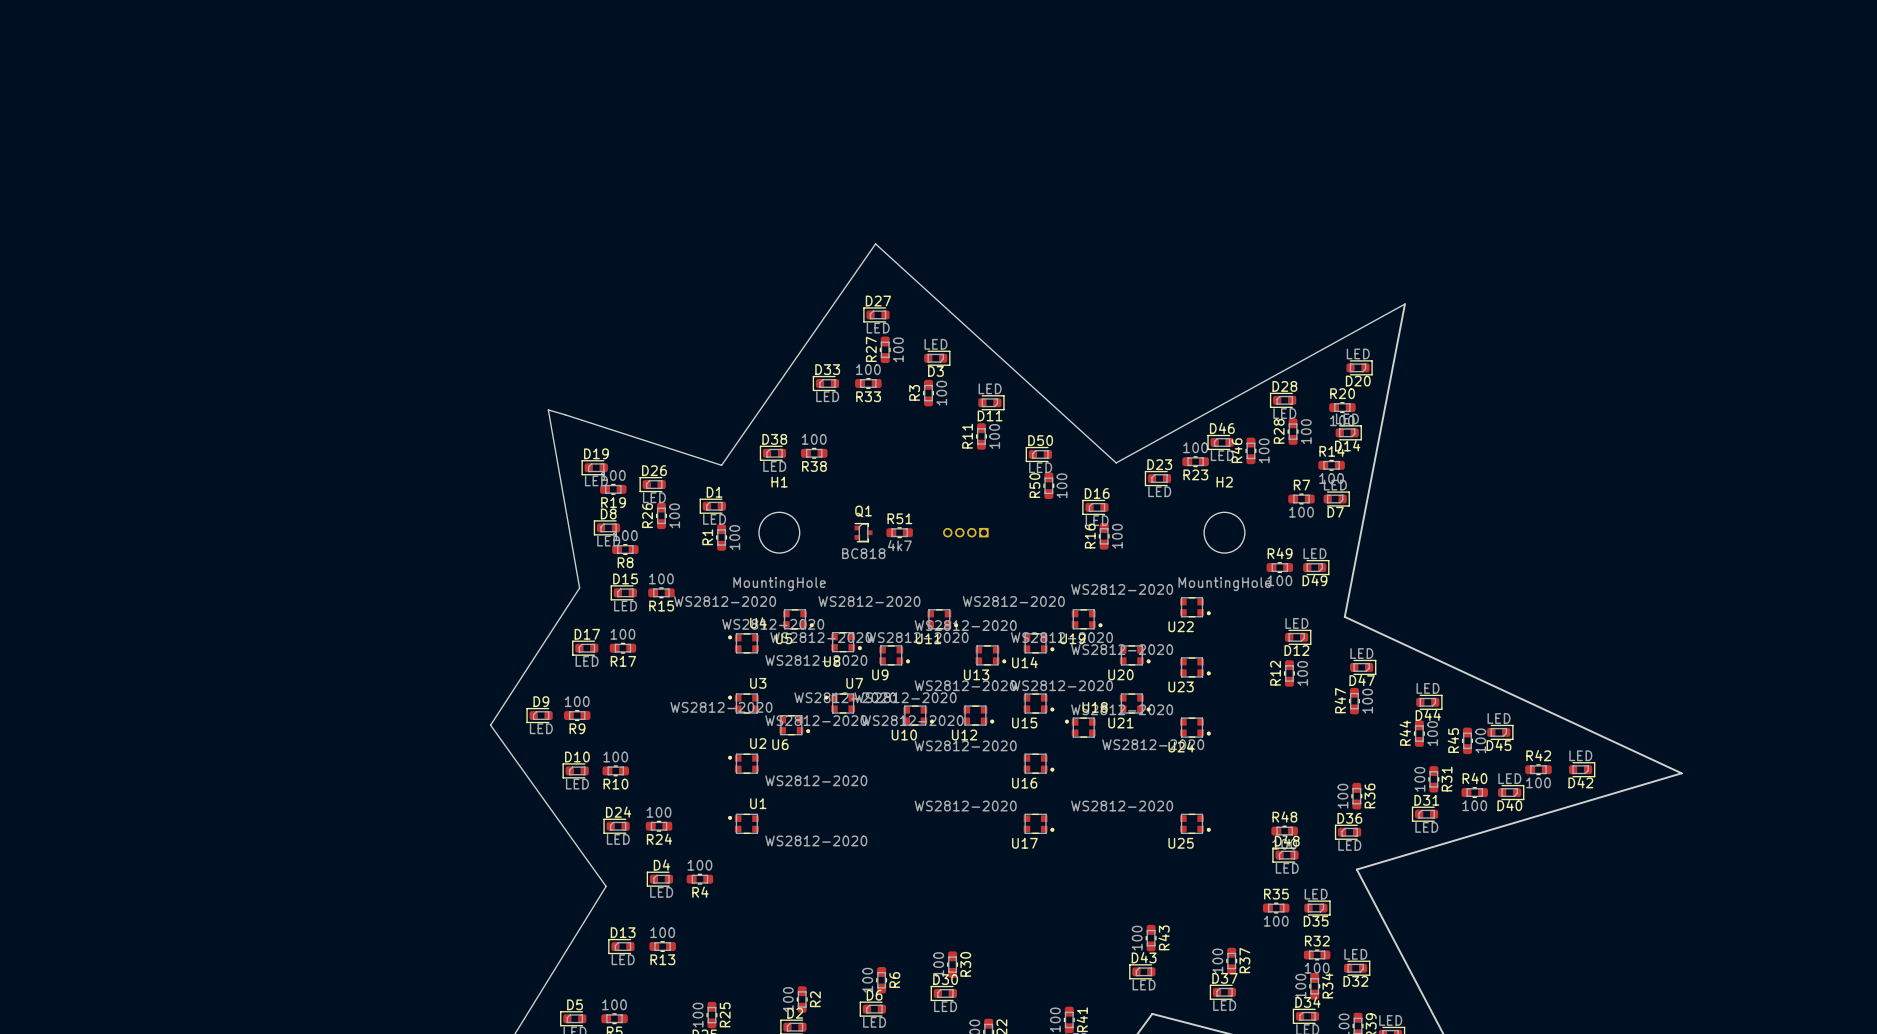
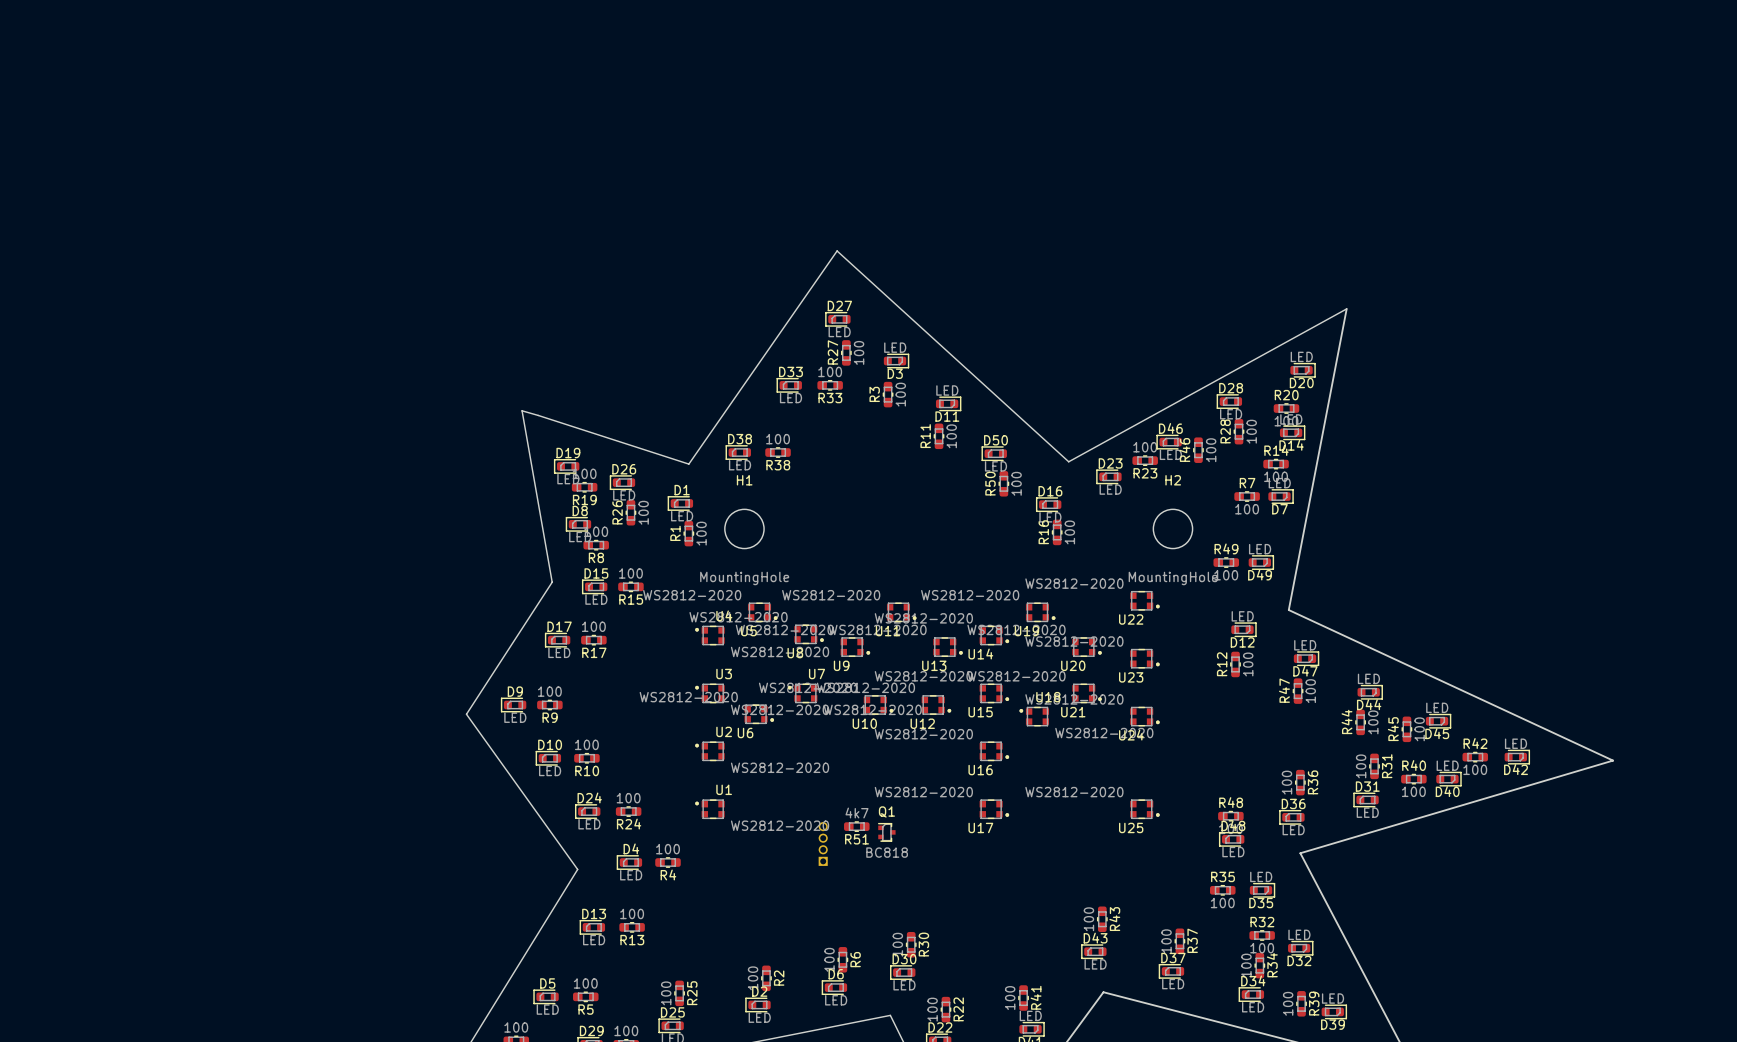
R51 name position: R51 (899, 518) -> R51 (857, 839)
Q1 position: (863, 532) -> (886, 832)
R51 position: (899, 532) -> (856, 826)
part: (965, 532) -> none
R51 value position: 4k7 (899, 545) -> 4k7 (857, 813)
part: none -> (823, 843)

